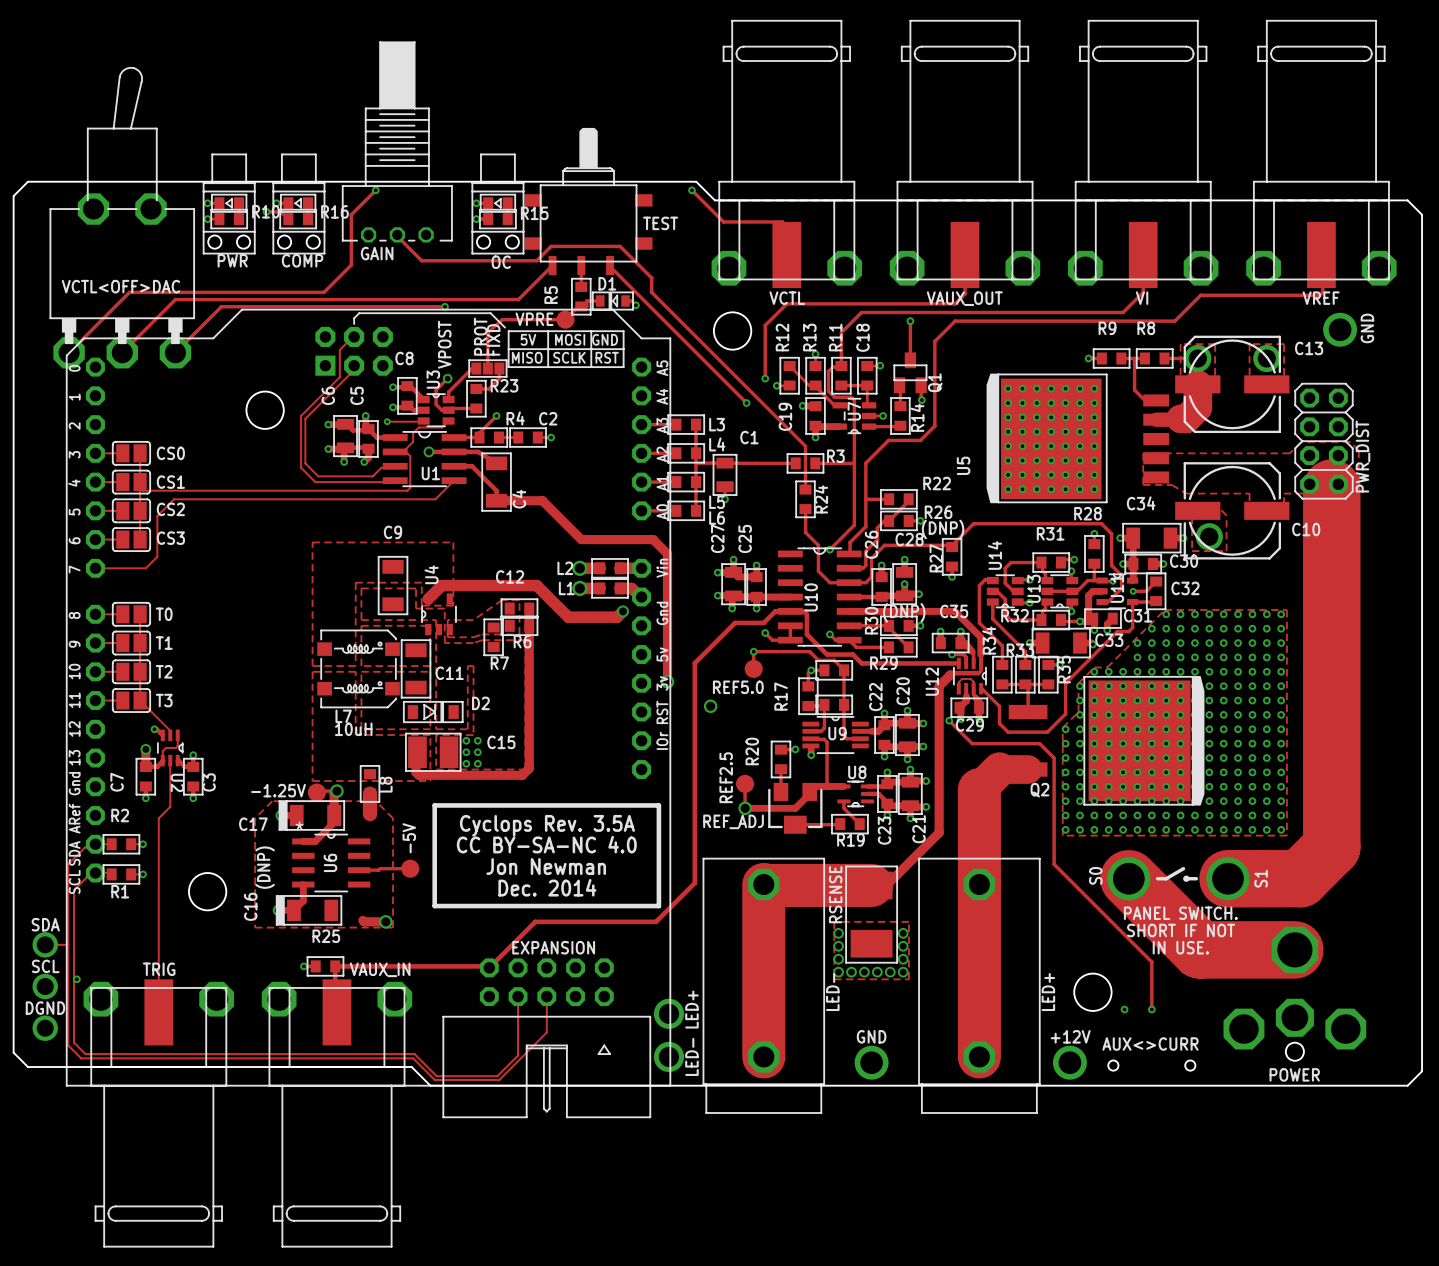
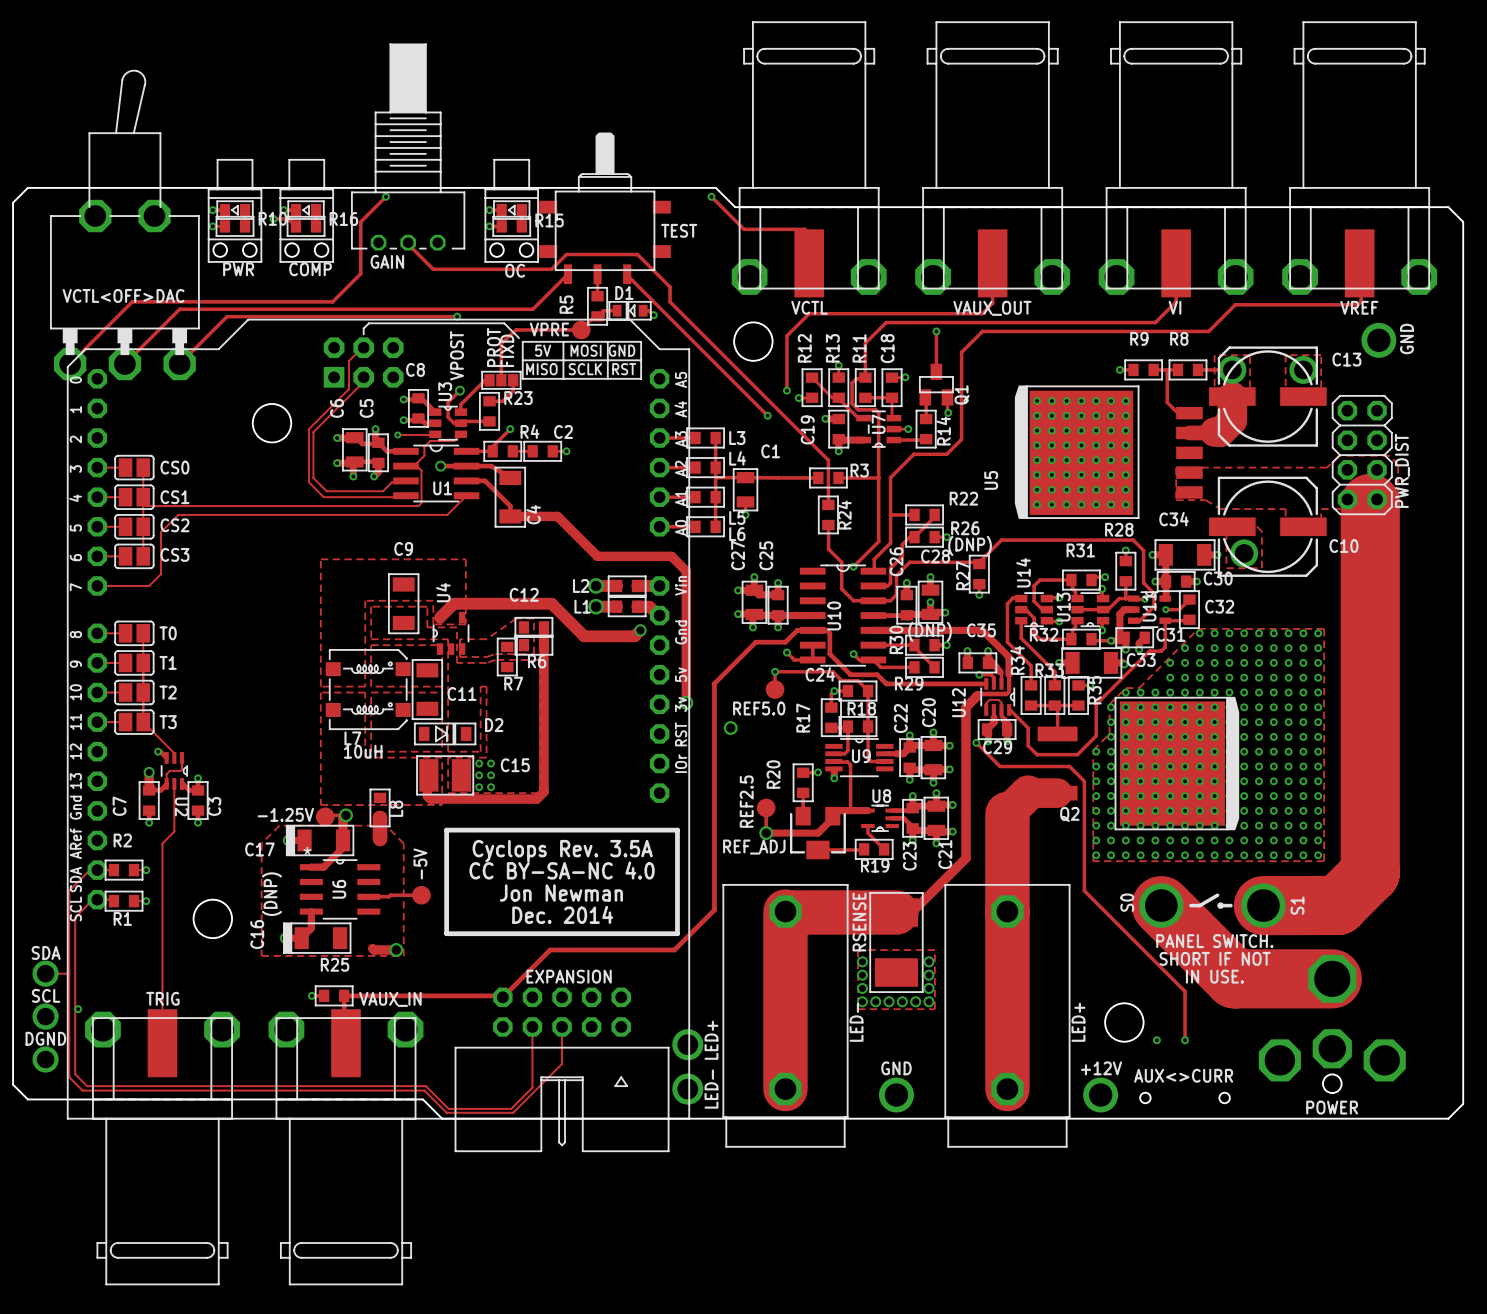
C24 name: none -> C24 (820, 674)
R18 name: none -> R18 (861, 708)

